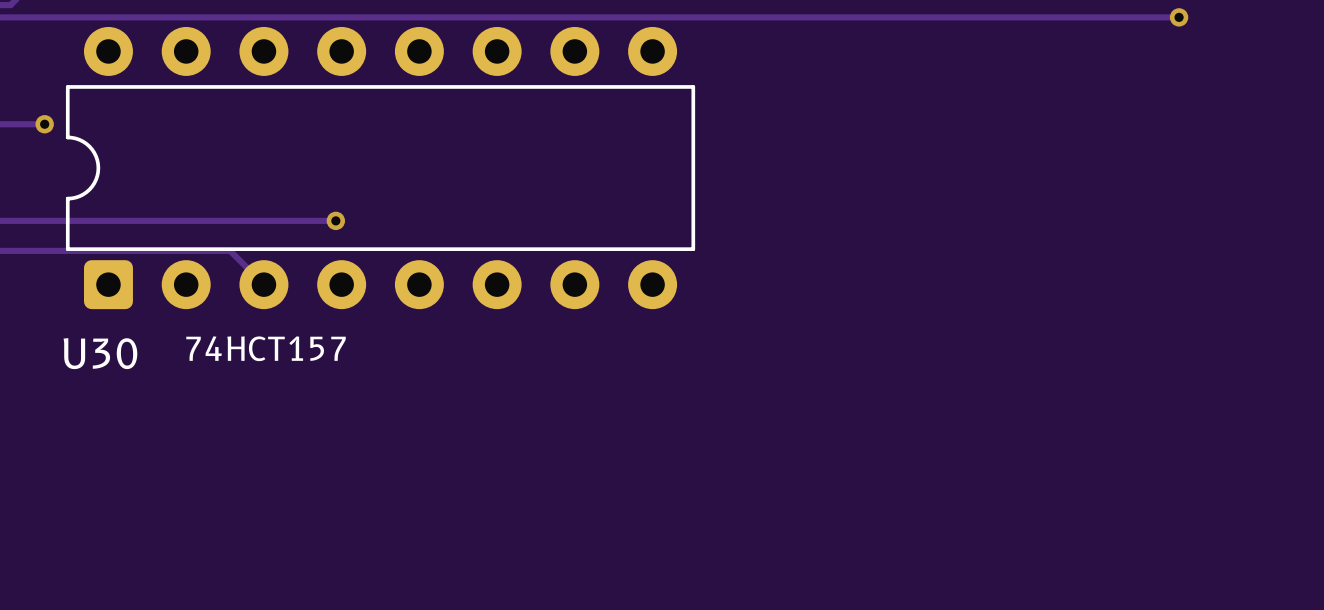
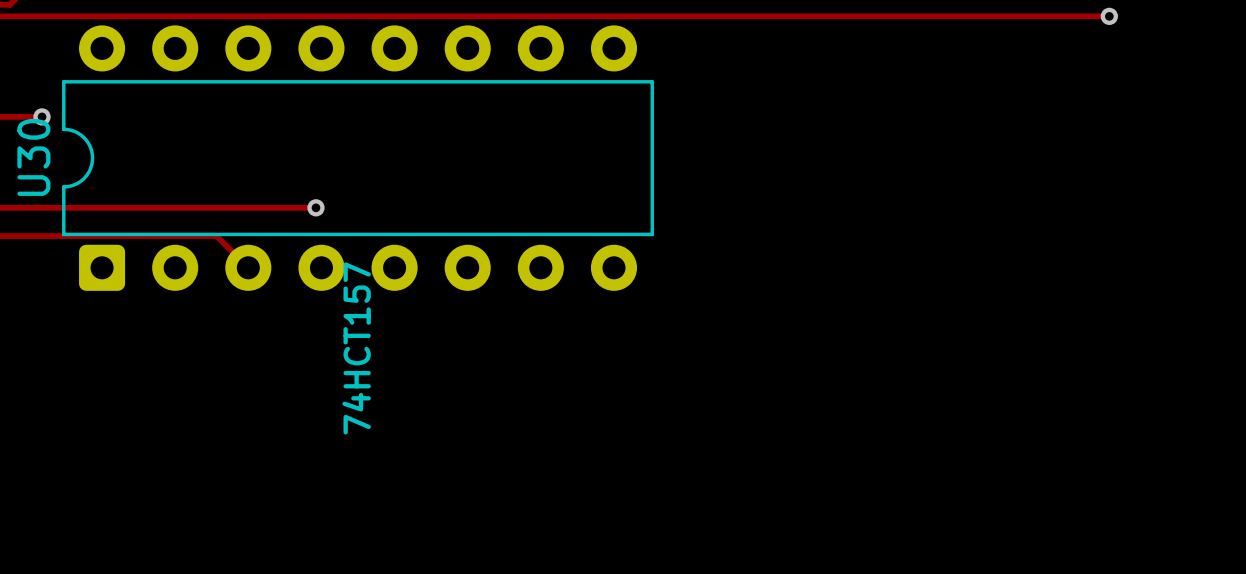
text: 74HCT157 (266, 348) -> none
U30 name rotation: 0° (100, 353) -> 90° counterclockwise (33, 157)
U30 name position: U30 (100, 353) -> U30 (33, 157)
U30 value: none -> 74HCT157 (356, 348)

